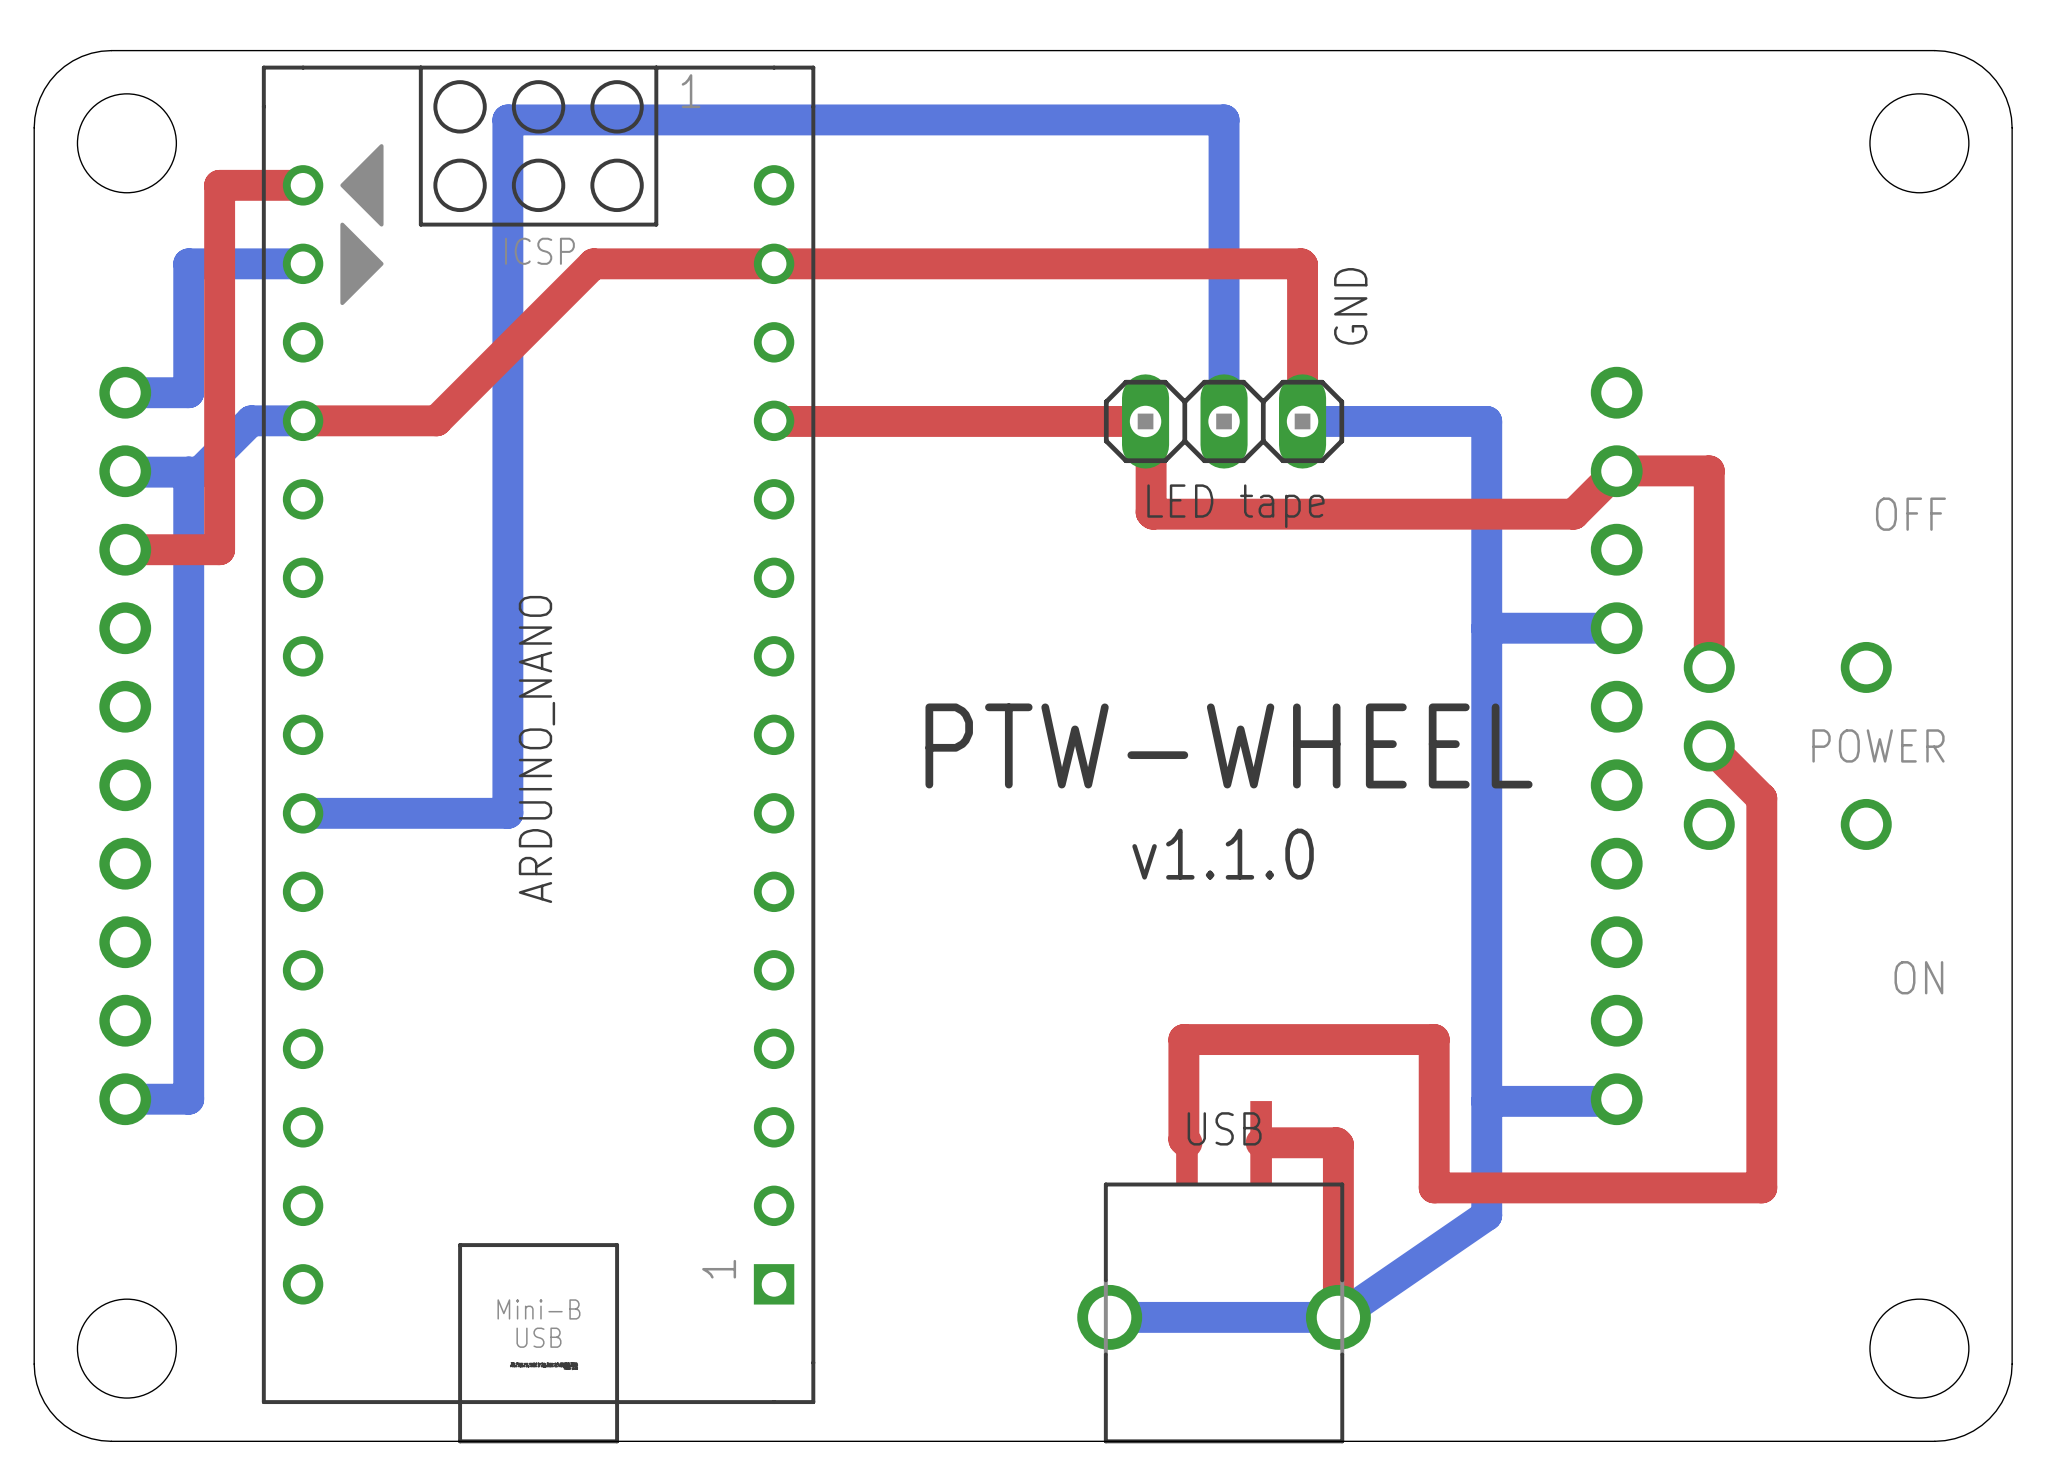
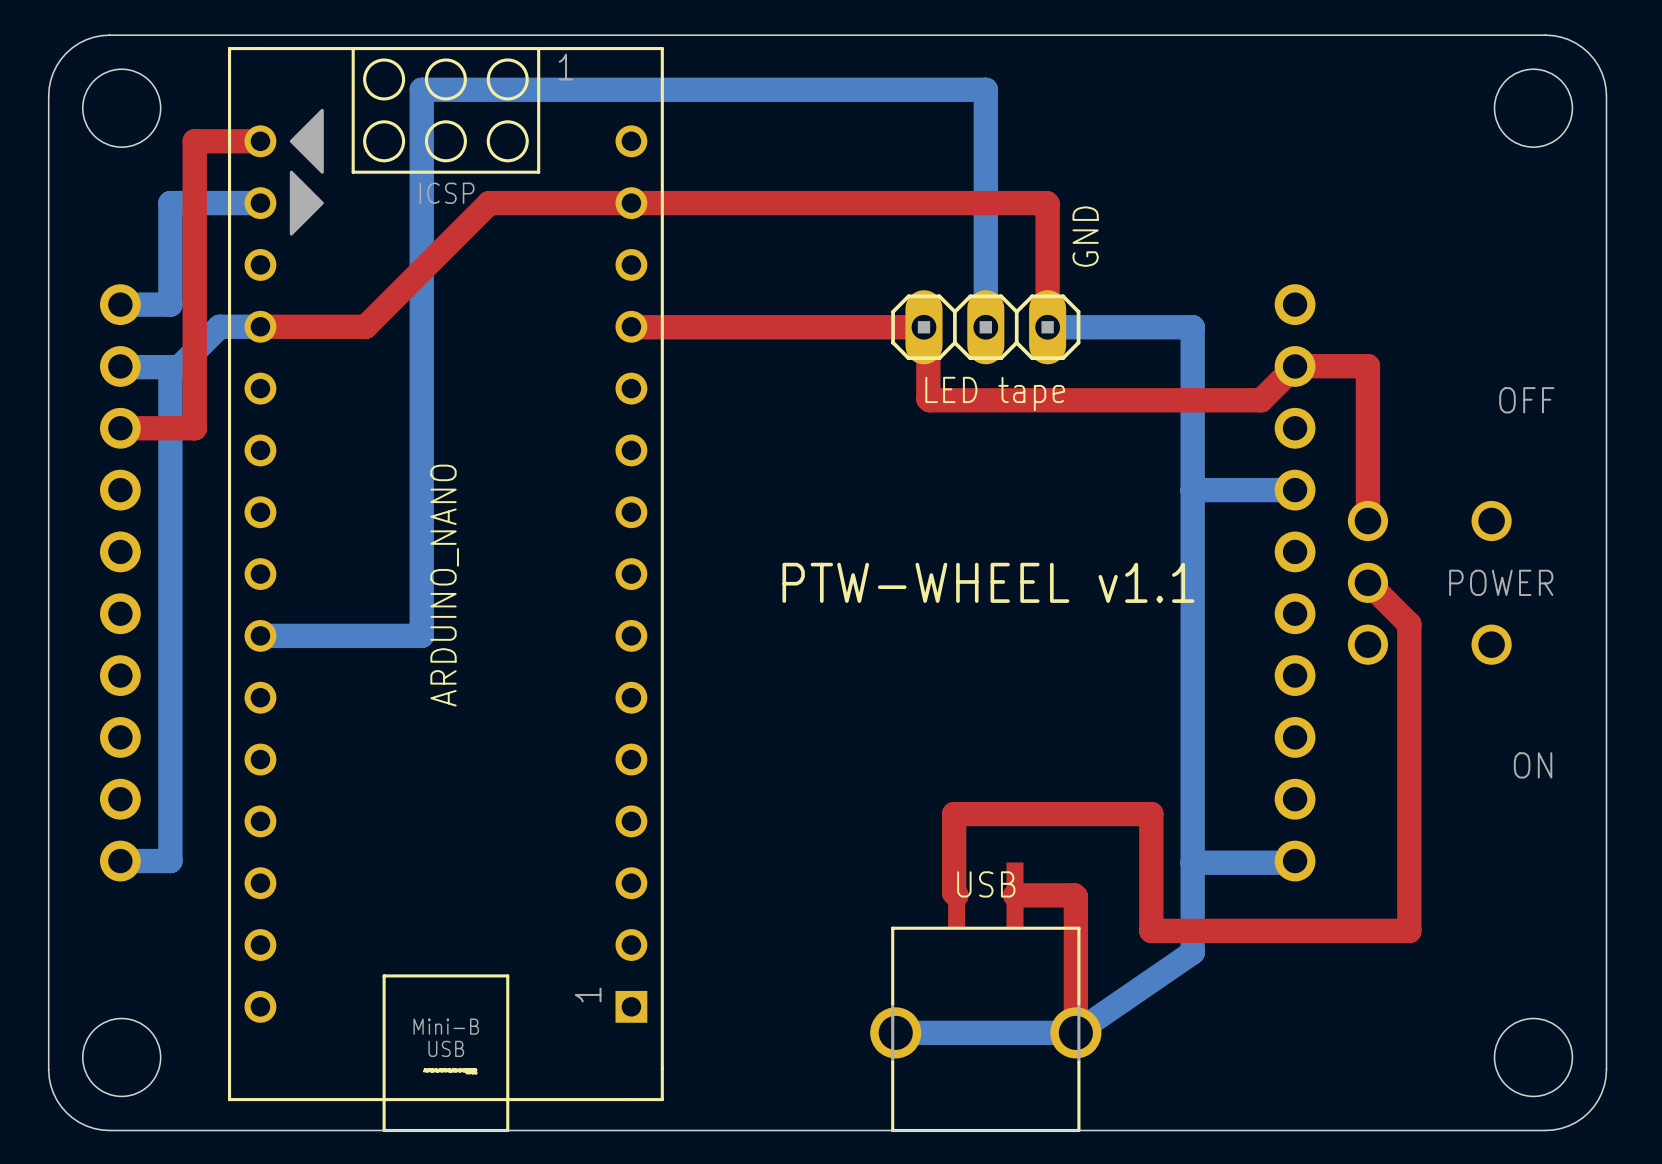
text: PTW-WHEEL (1229, 745) -> PTW-WHEEL v1.1 (988, 582)
text: v1.1.0 (1223, 854) -> none

